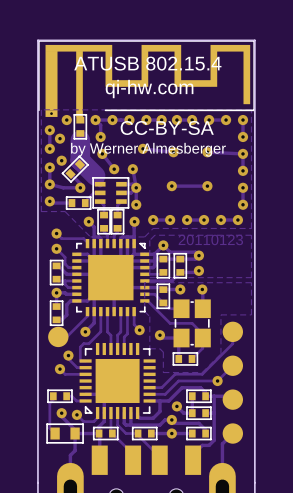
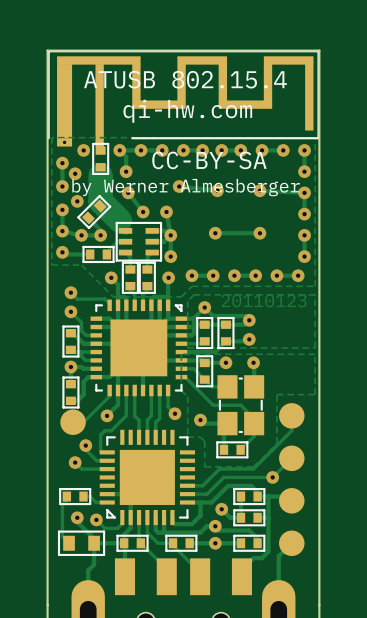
via: none -> (81, 235)

